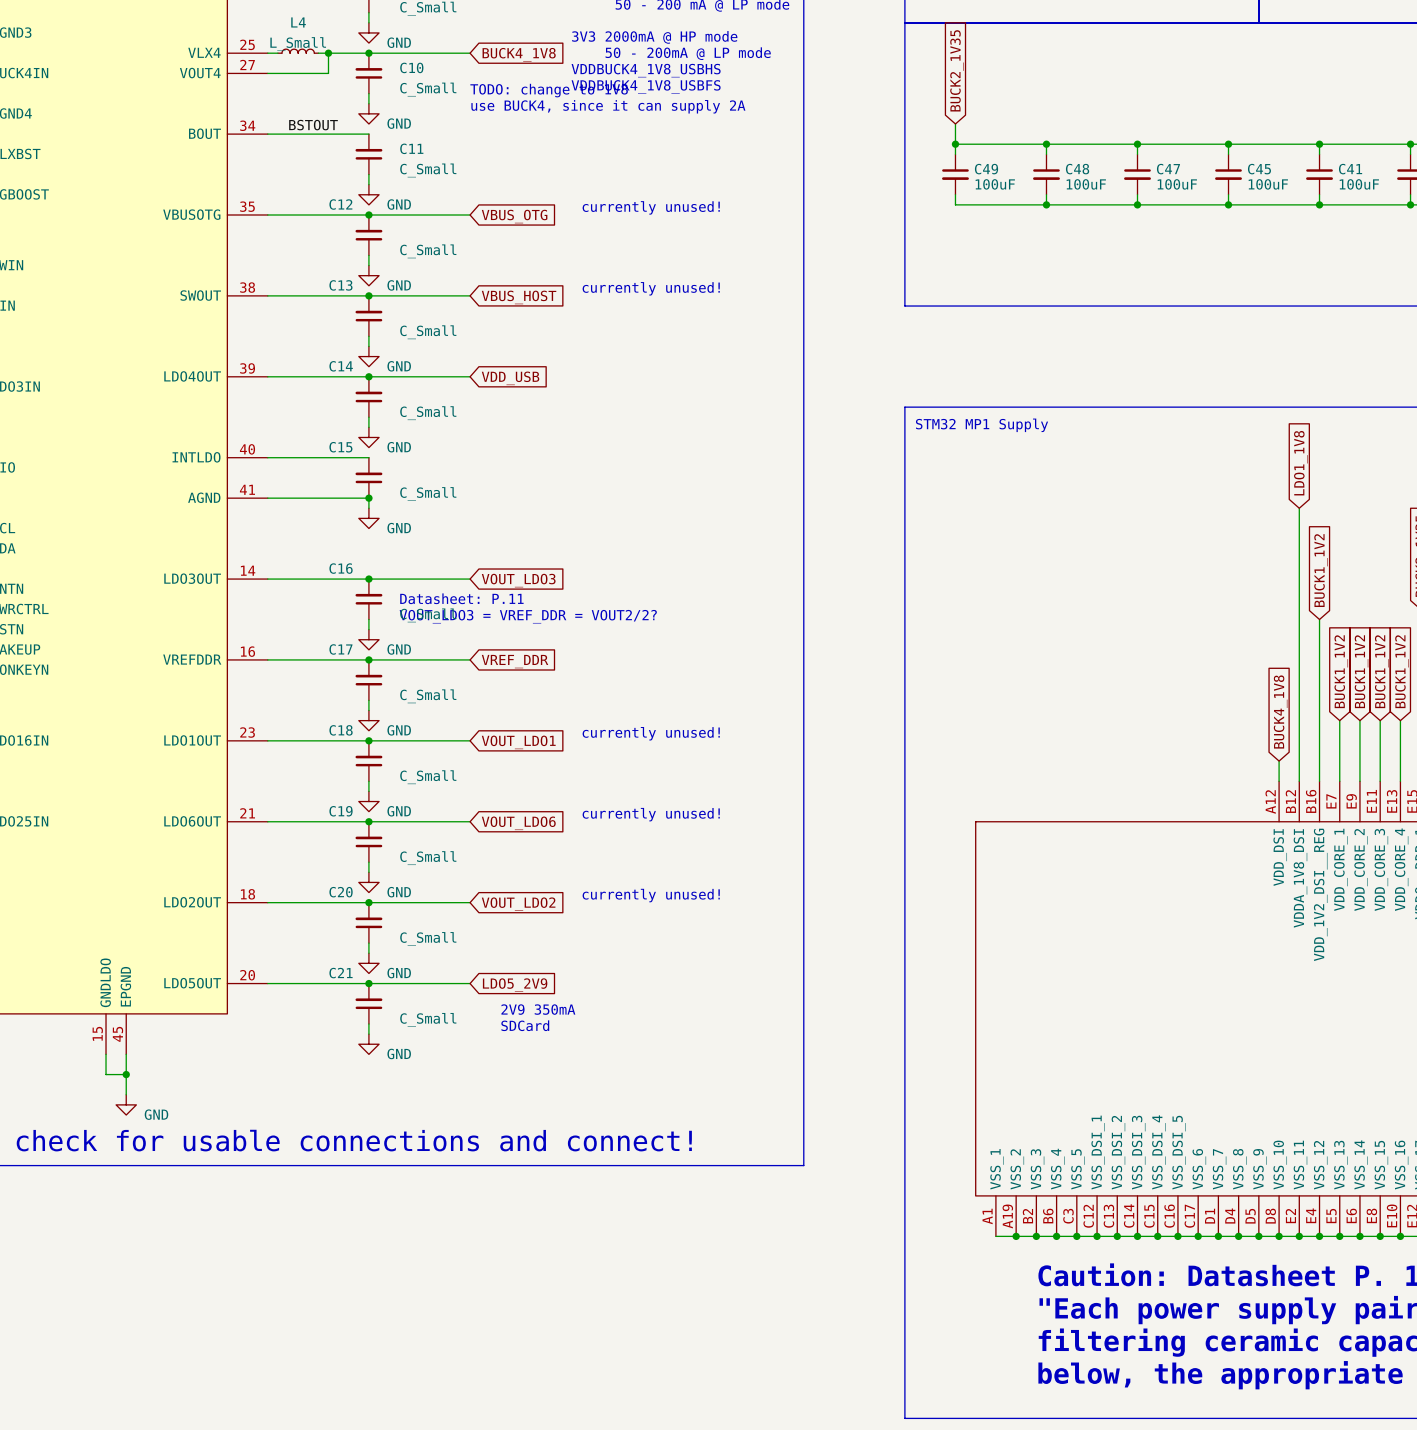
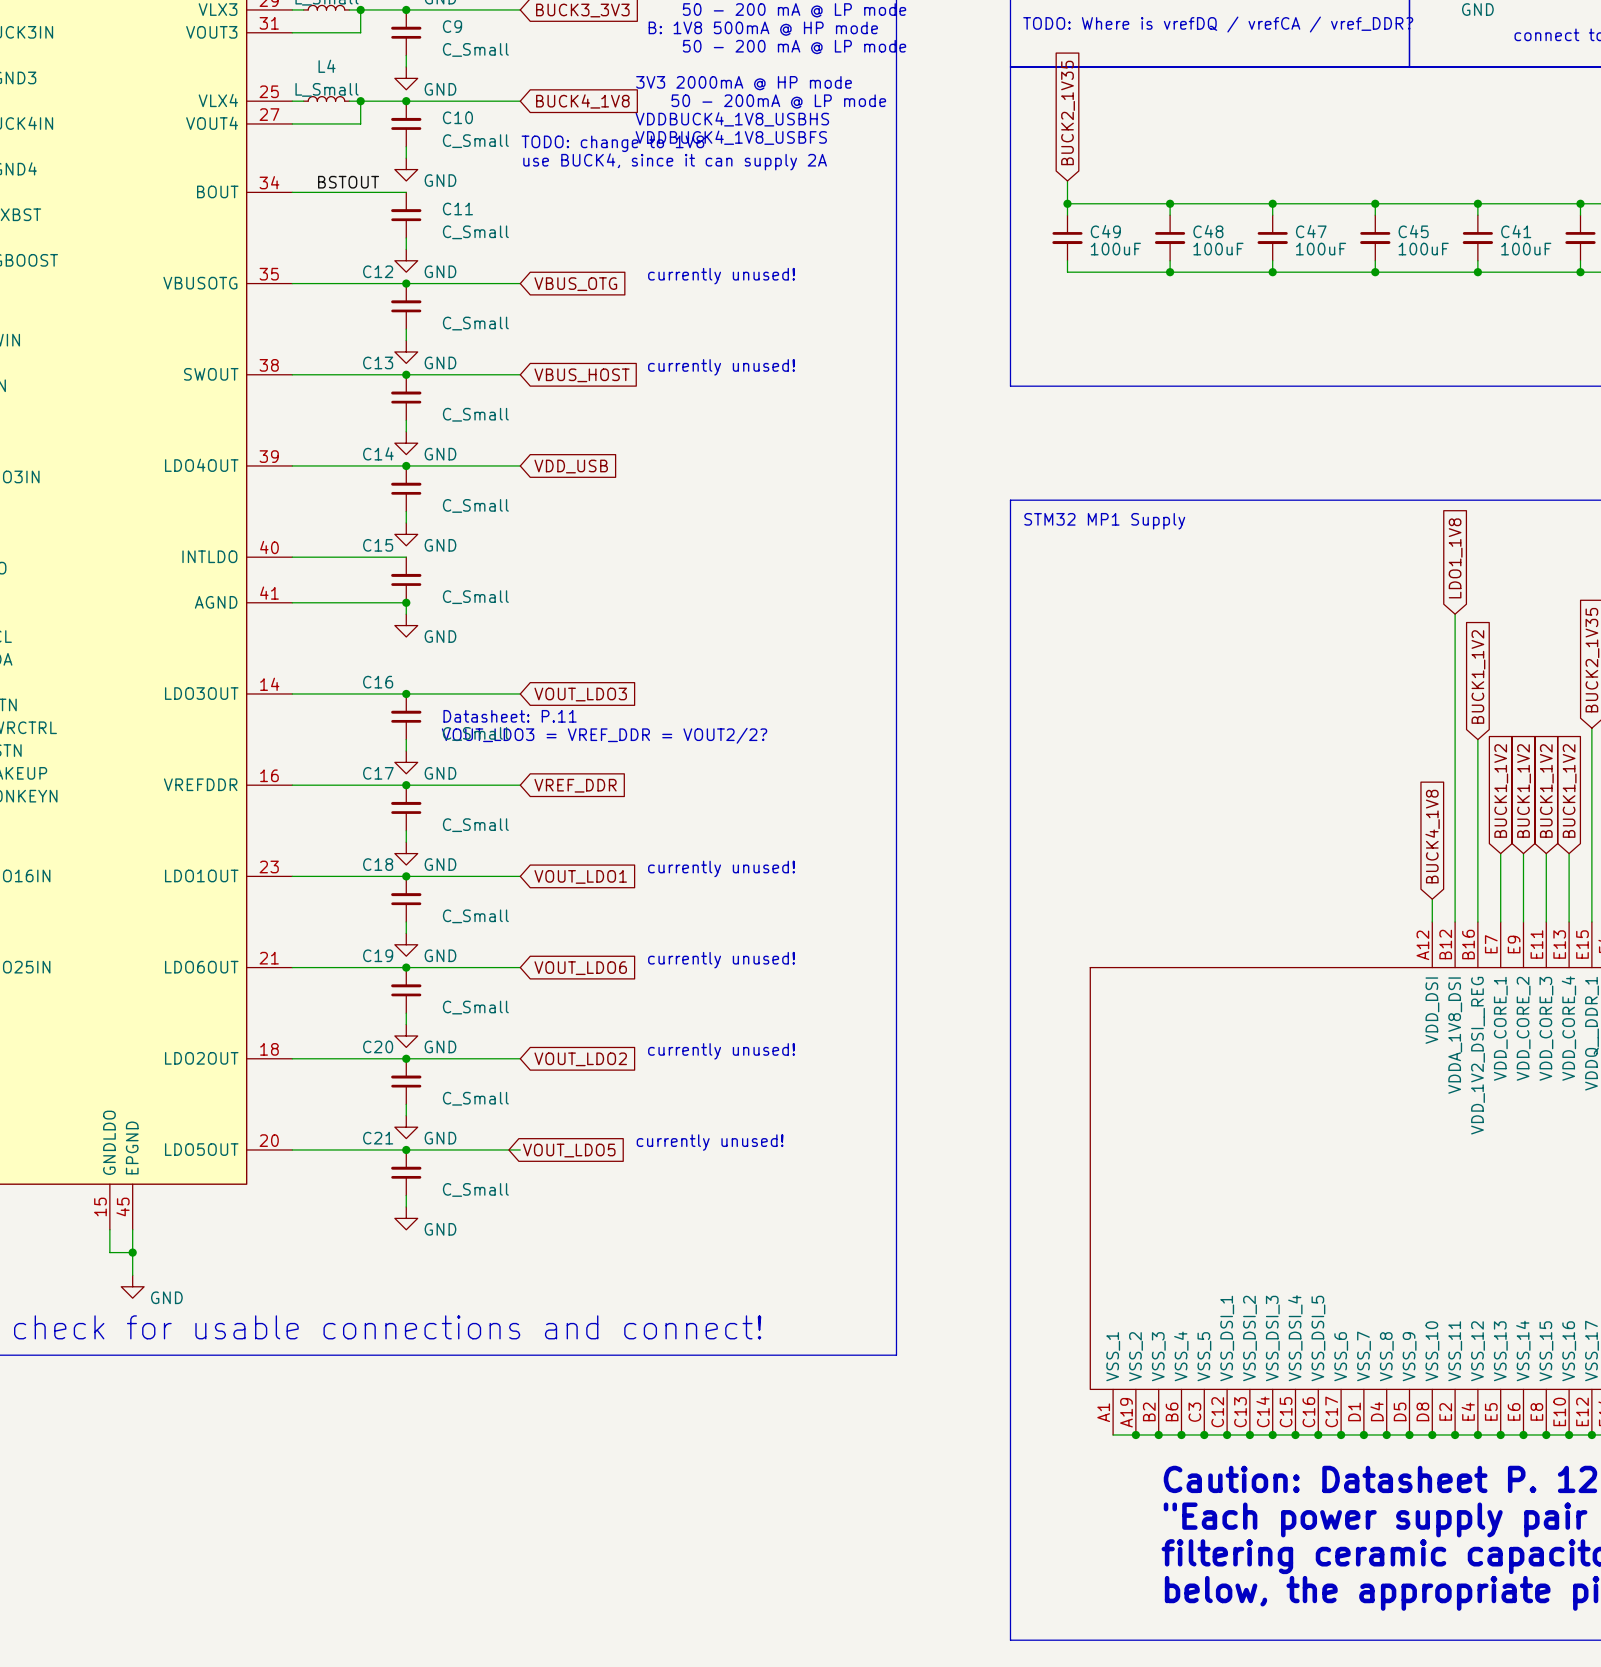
text: none -> currently unused! (710, 1142)
global label: none -> VOUT_LDO5 (569, 1150)
global label: LDO5_2V9 (515, 985) -> none
text: 2V9 350mA (538, 1009) -> none
text: SDCard (525, 1025) -> none

